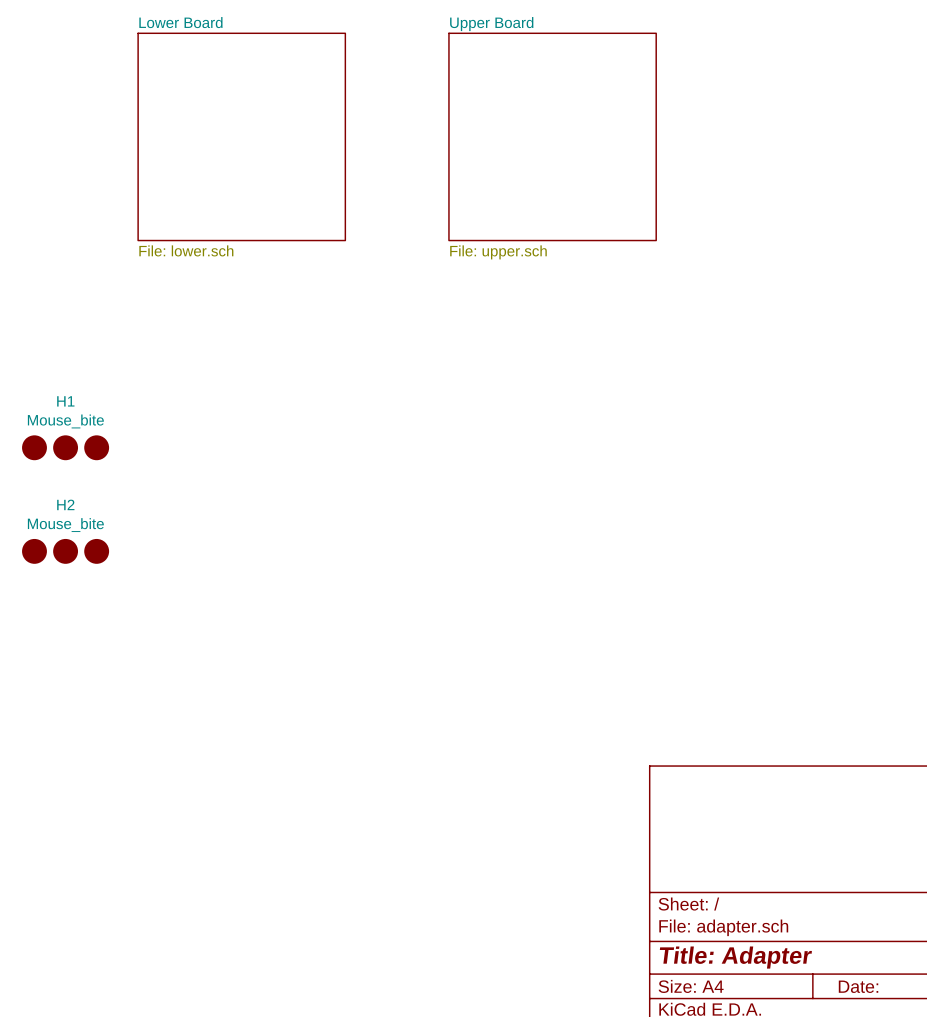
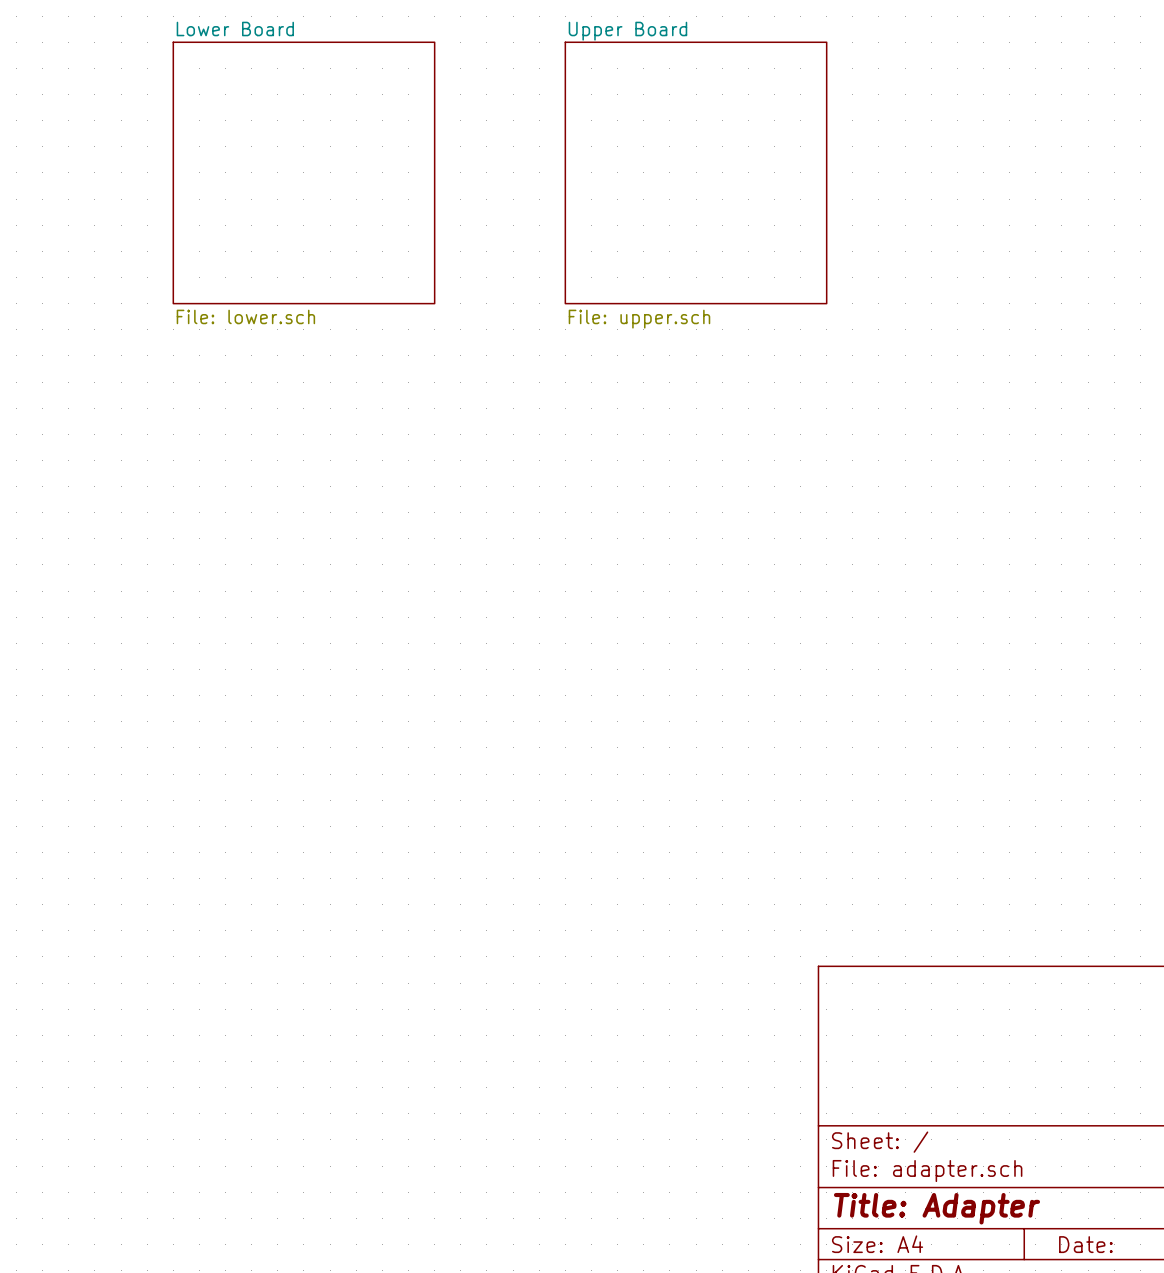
H1: Mouse_bite (65, 447) -> none
H2: Mouse_bite (65, 551) -> none

